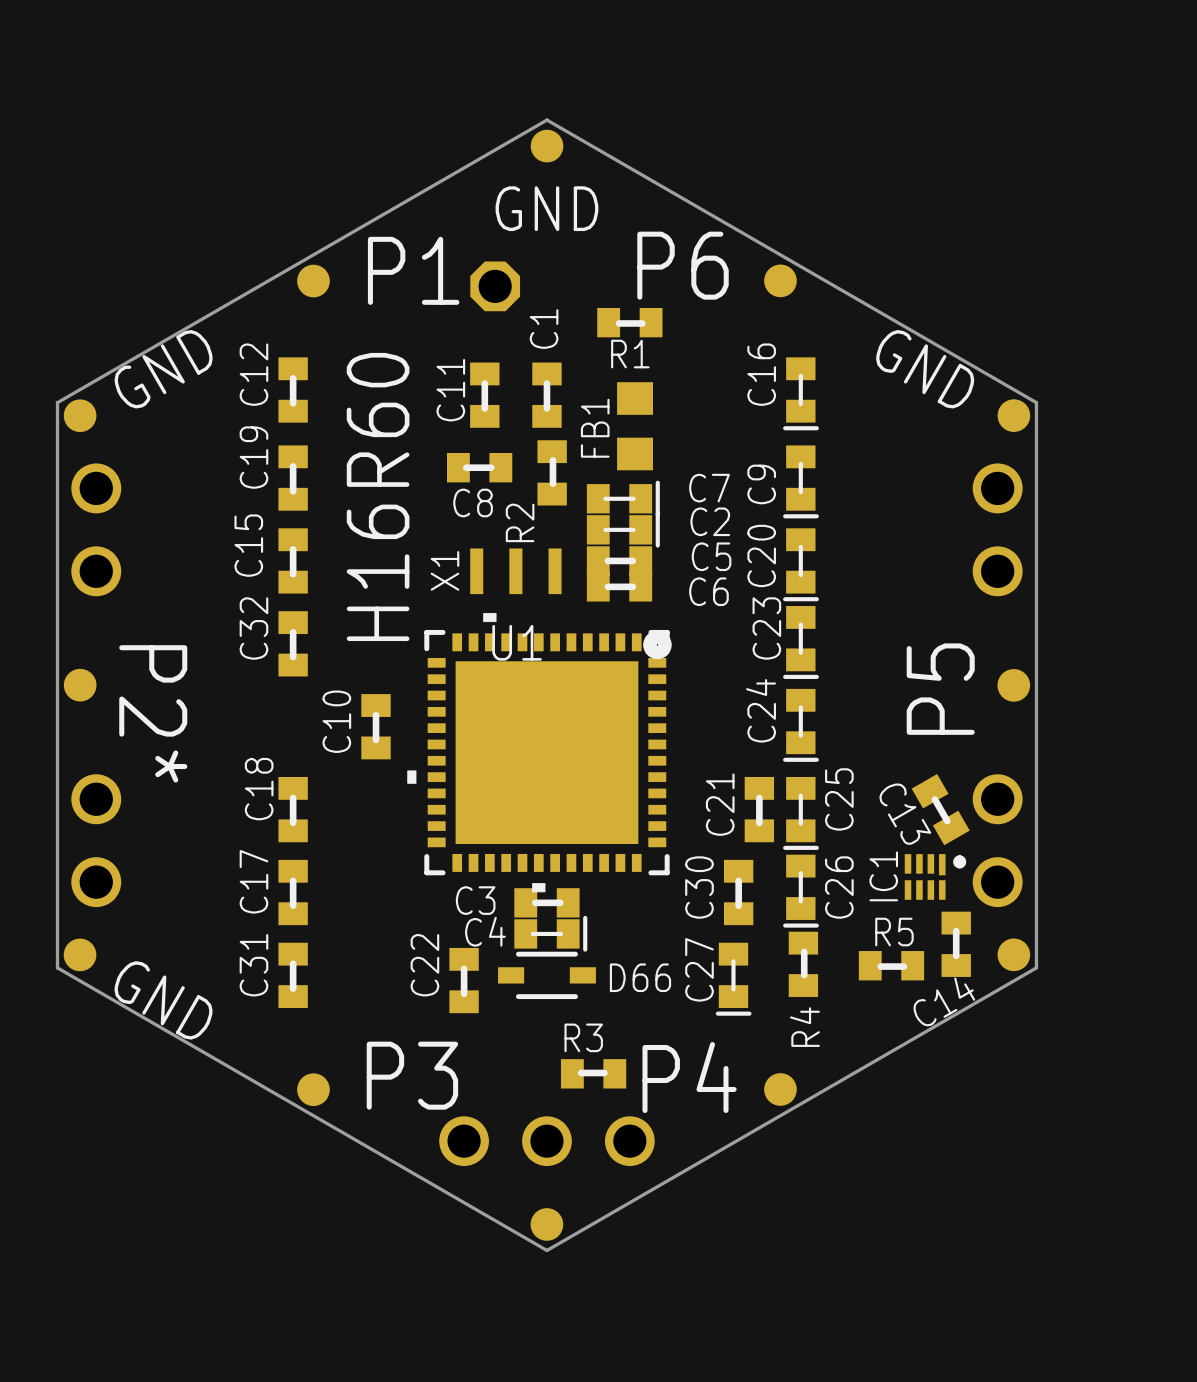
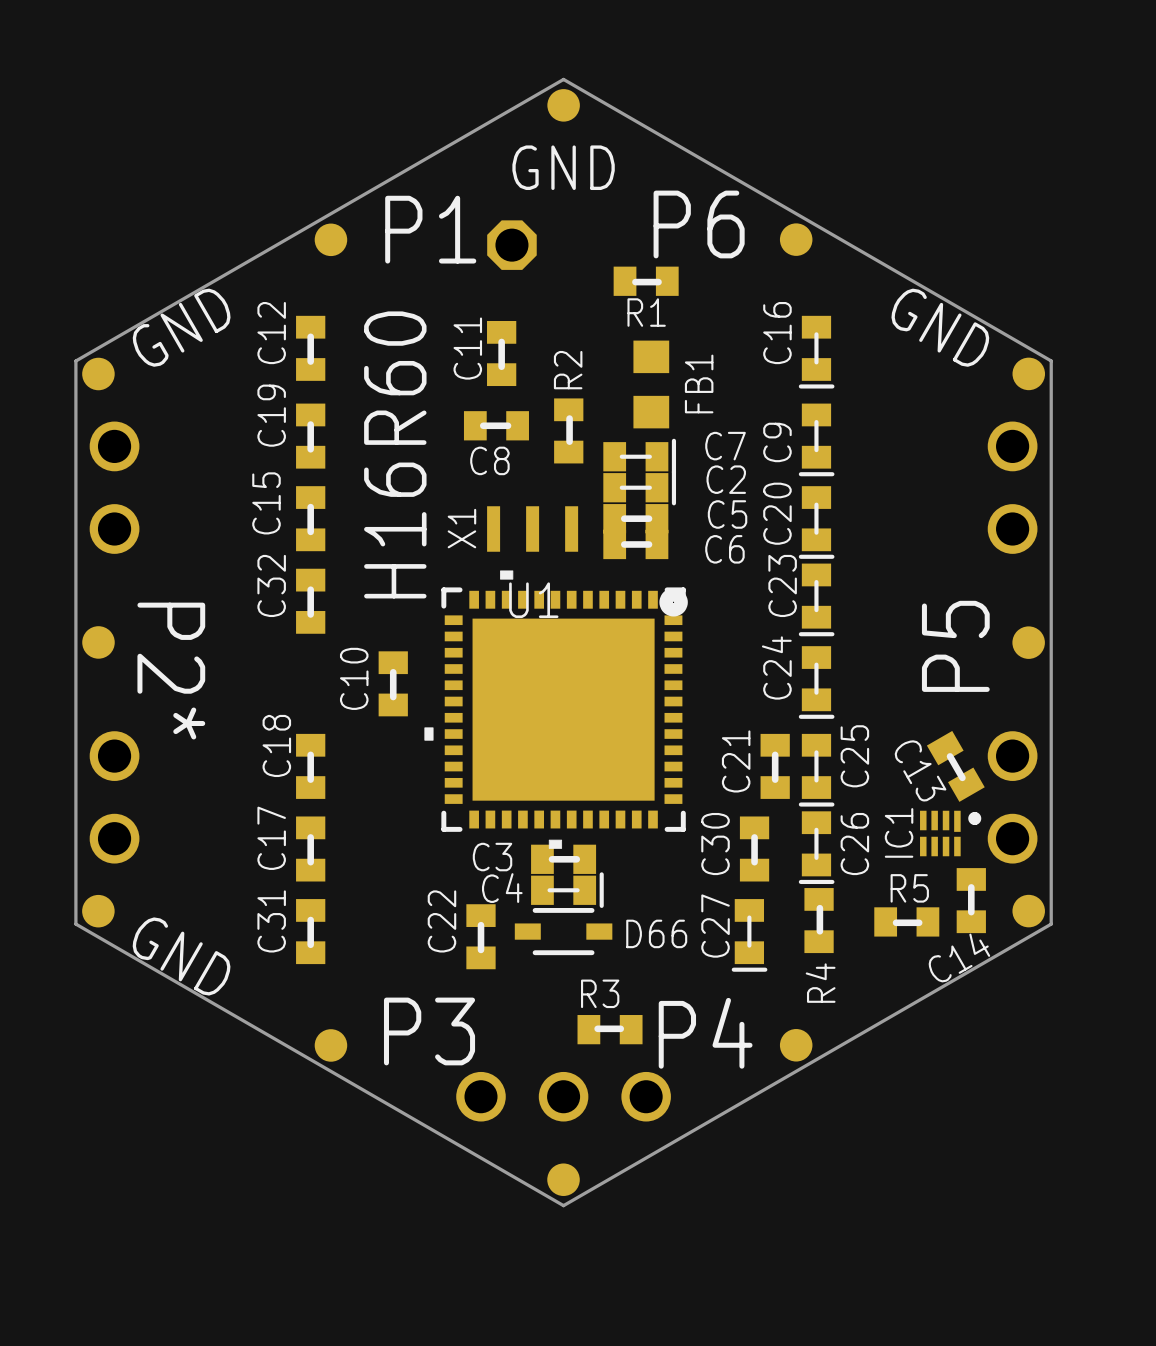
C1: (546, 395) -> none
FB1 name position: FB1 (595, 428) -> FB1 (699, 383)
R2 name position: R2 (520, 522) -> R2 (568, 370)

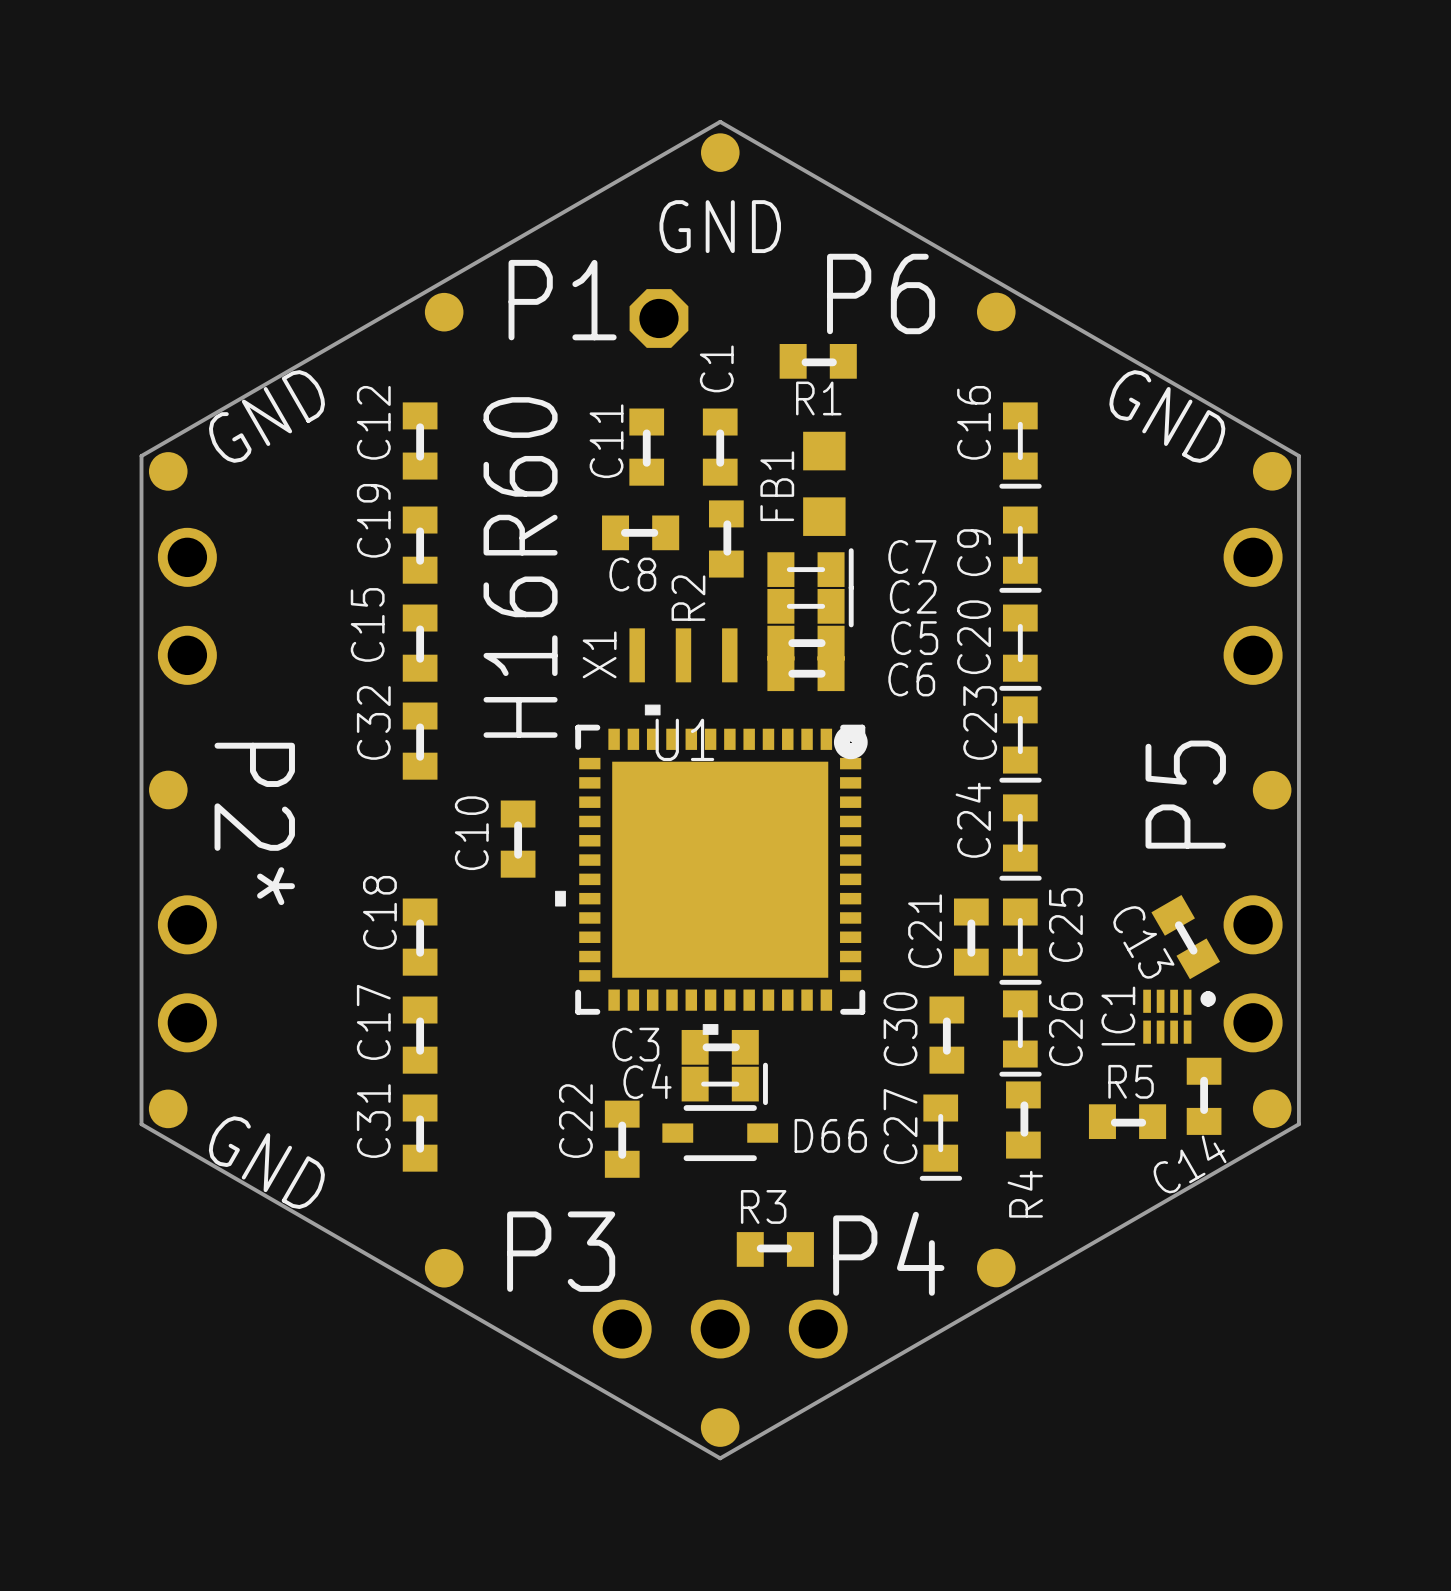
C1: none -> (720, 447)
R2 name position: R2 (568, 370) -> R2 (688, 598)
FB1 name position: FB1 (699, 383) -> FB1 (777, 486)

